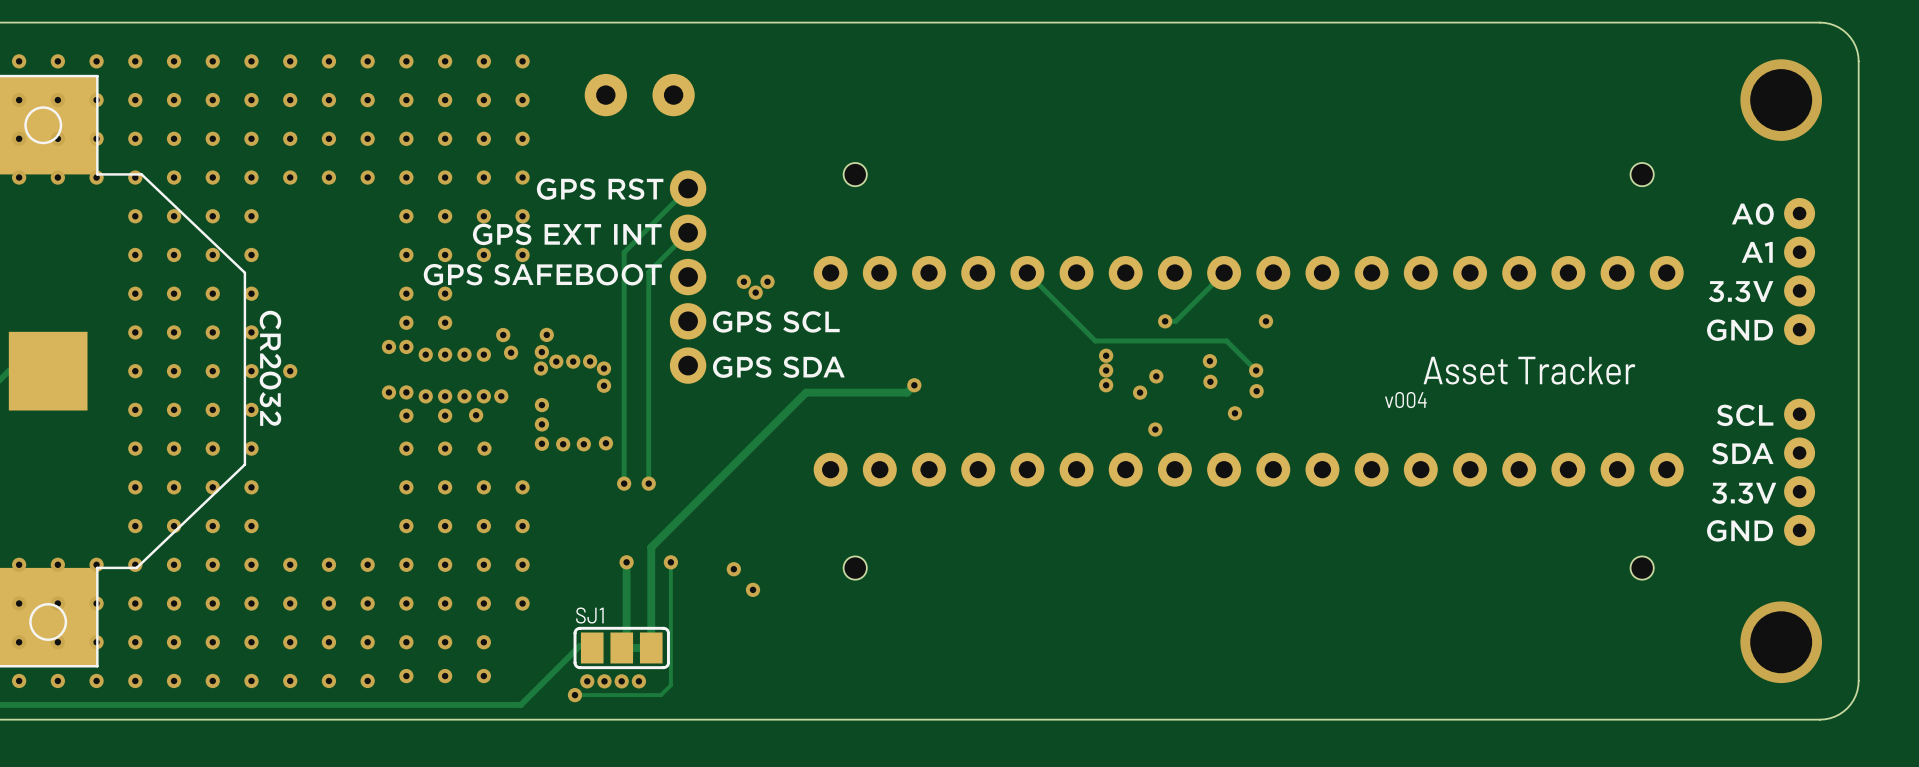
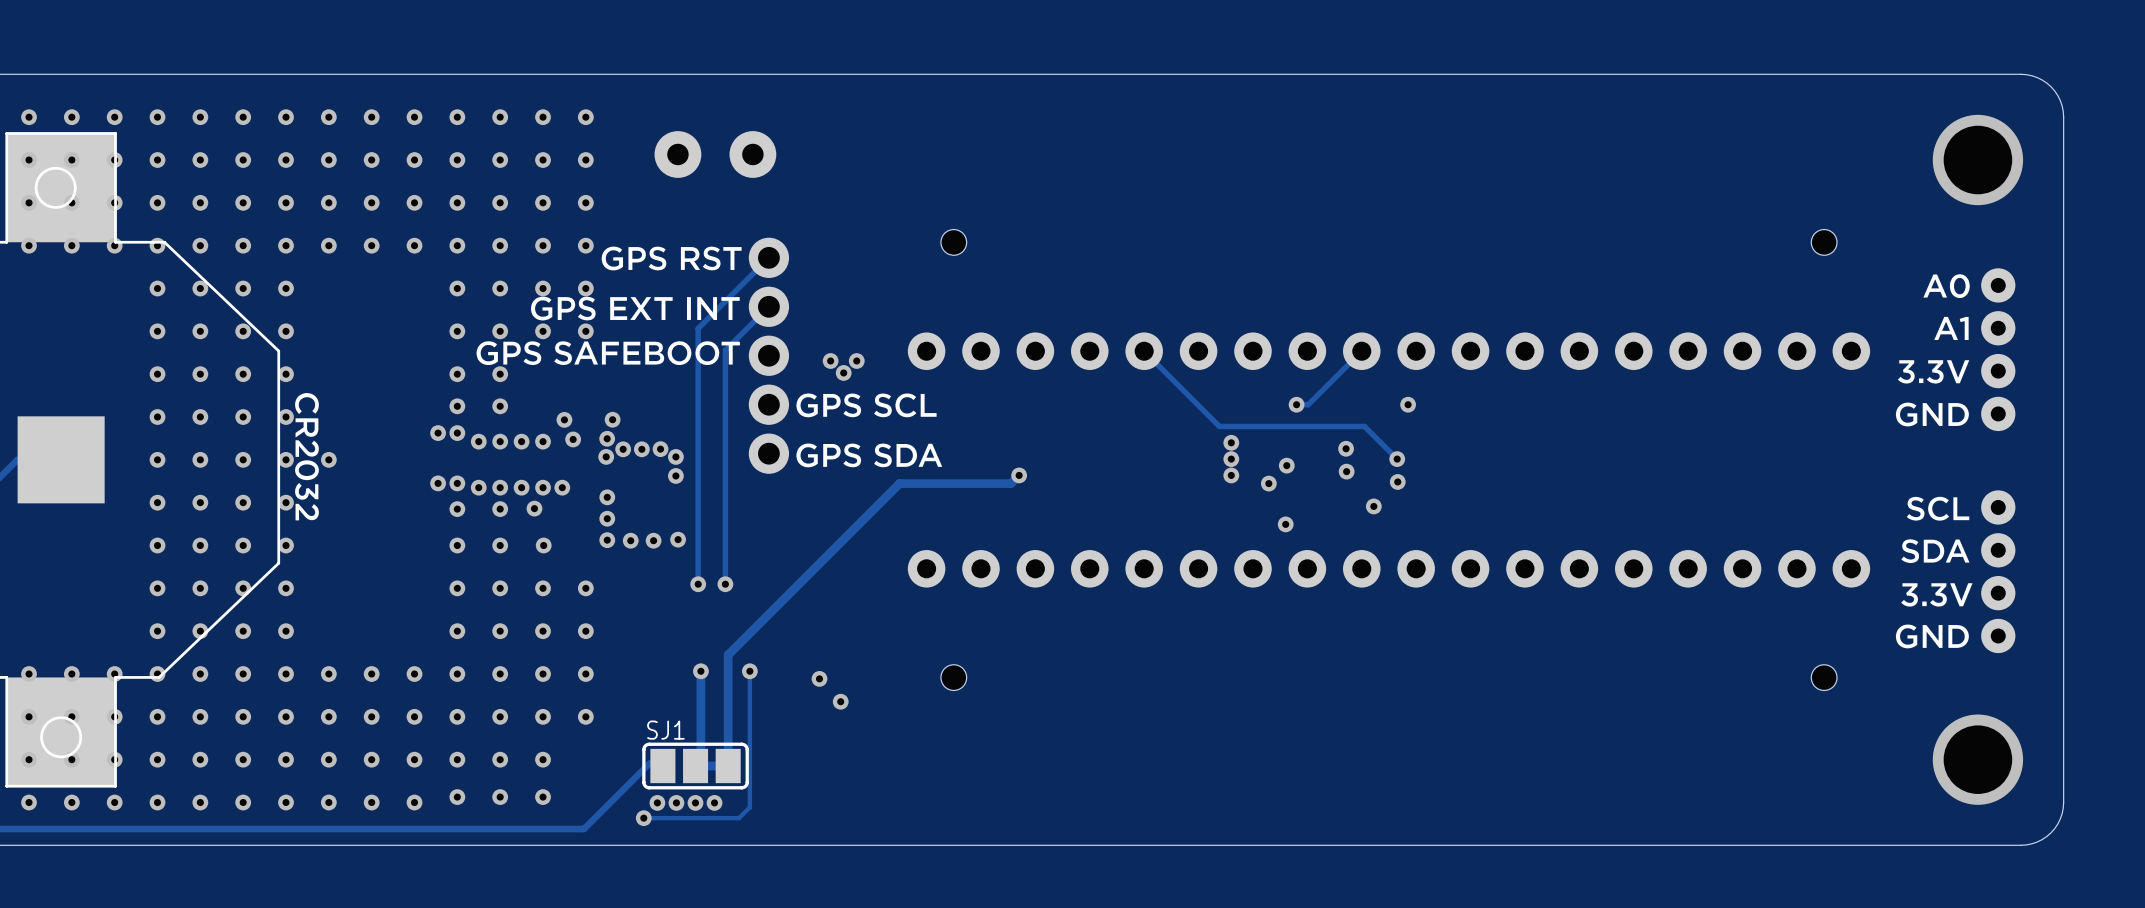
text: Asset Tracker (1529, 370) -> none
text: v004 (1405, 400) -> none

